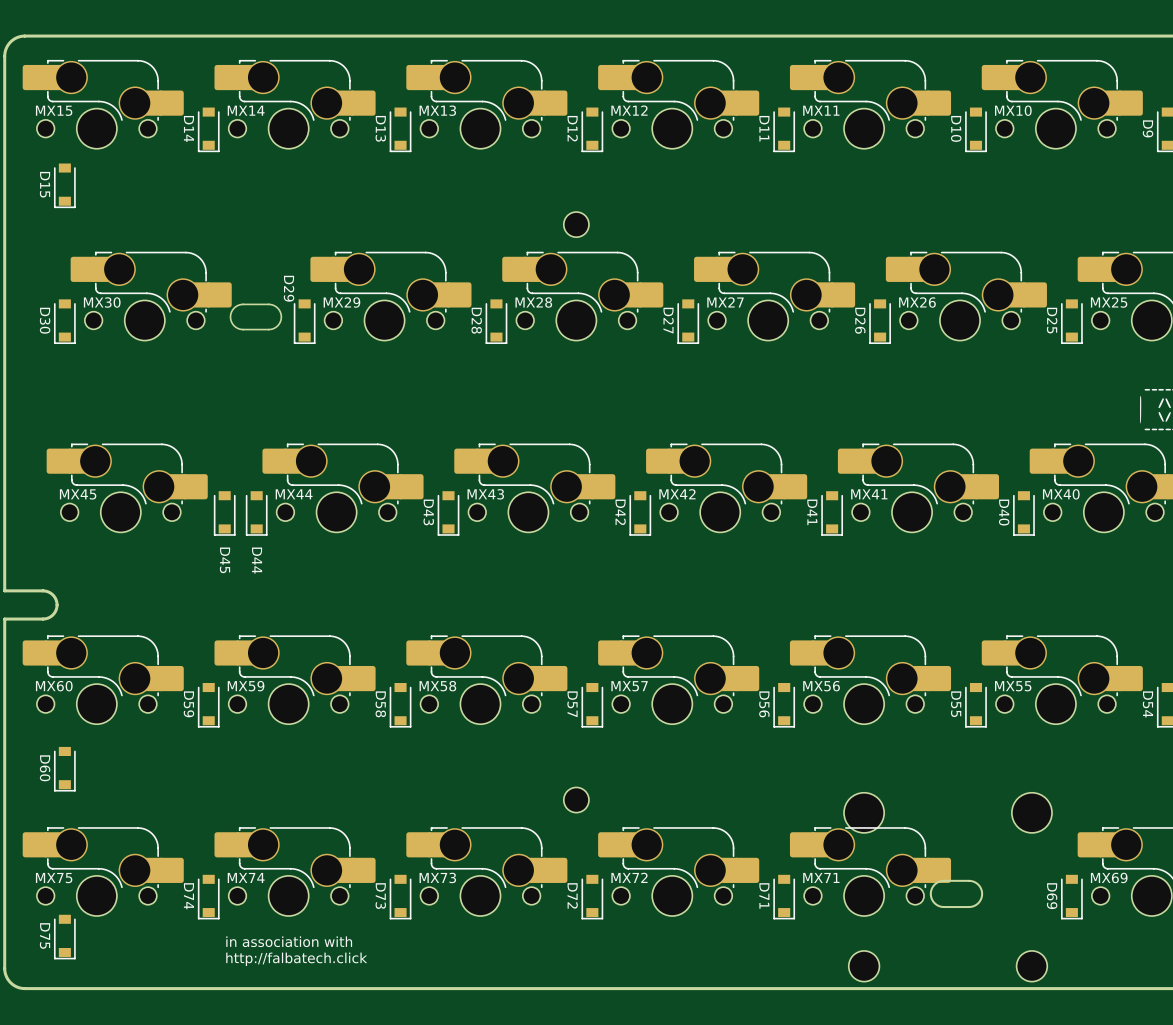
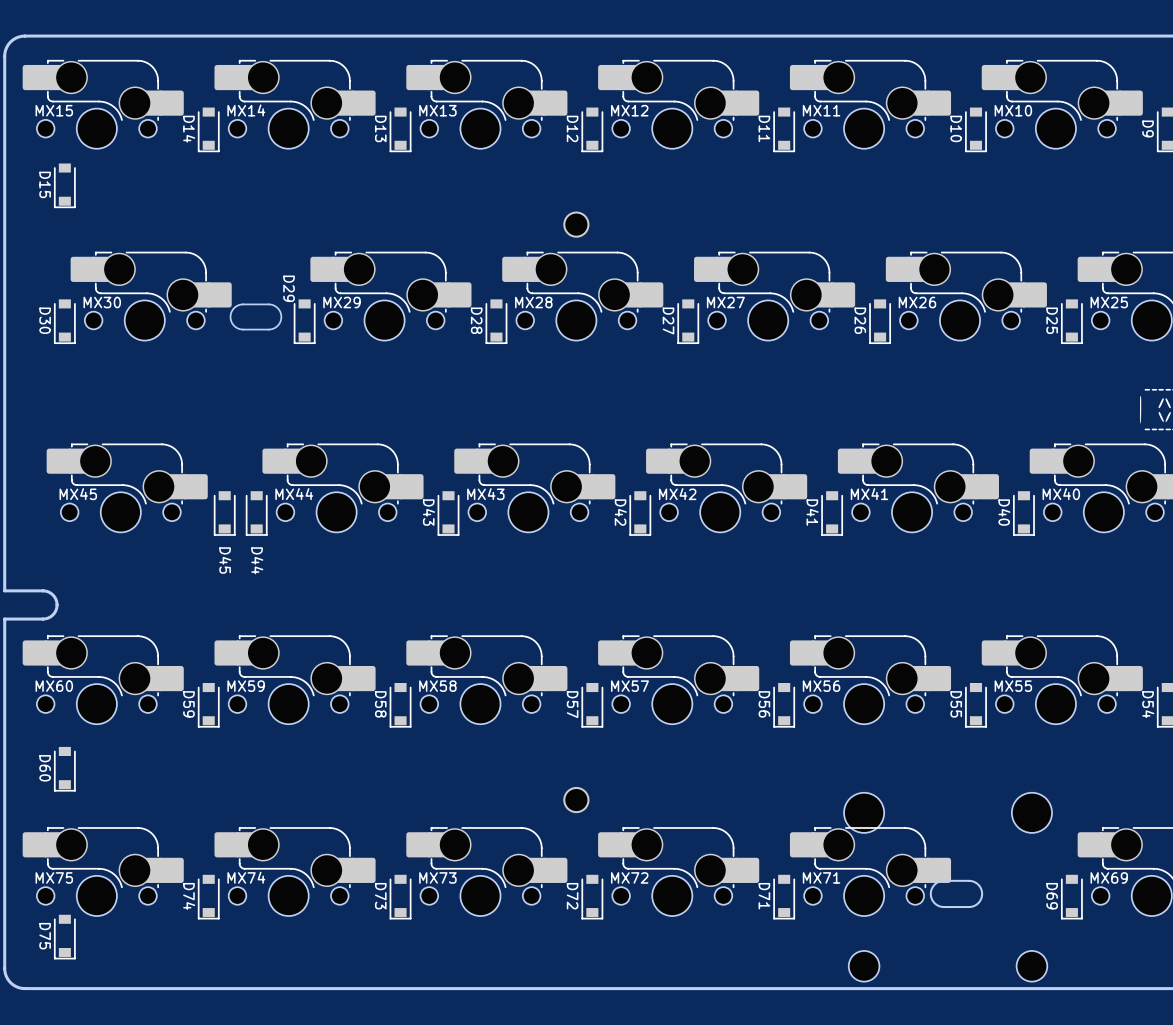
part footprint: [563, 212, 589, 238] -> [563, 211, 590, 238]
part footprint: [563, 787, 589, 813] -> [563, 786, 590, 814]
text: in association with (289, 941) -> none
text: http://falbatech.click (296, 959) -> none

